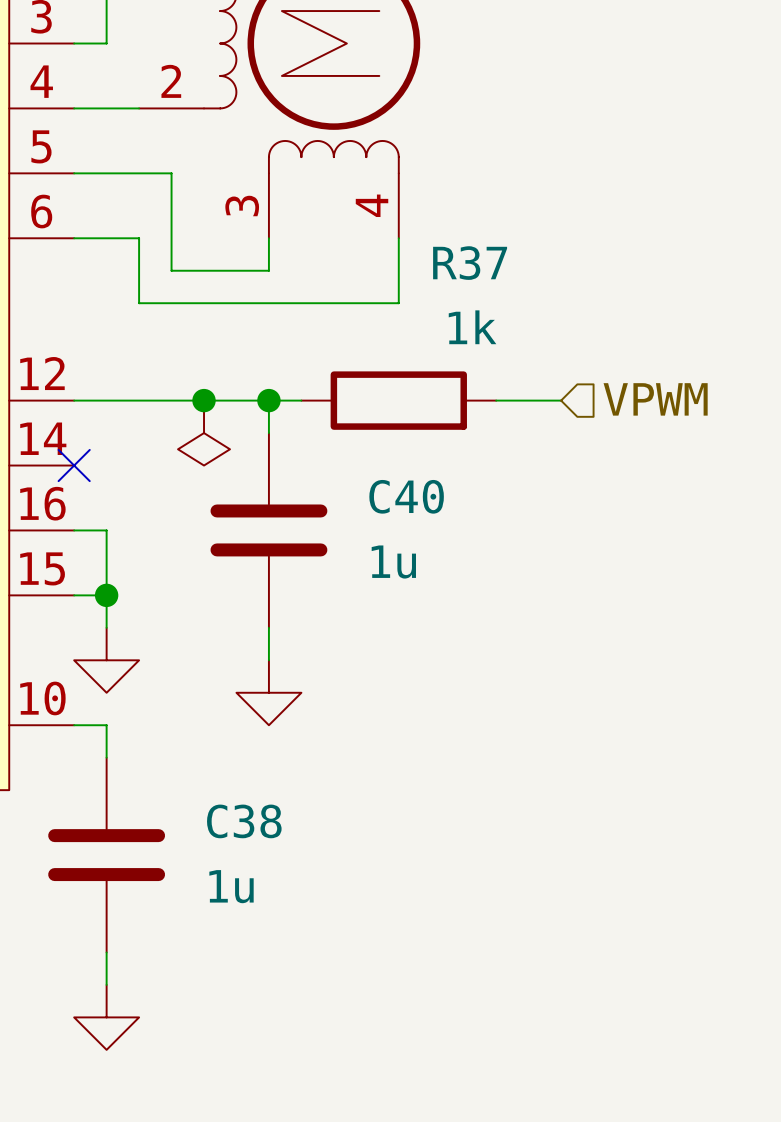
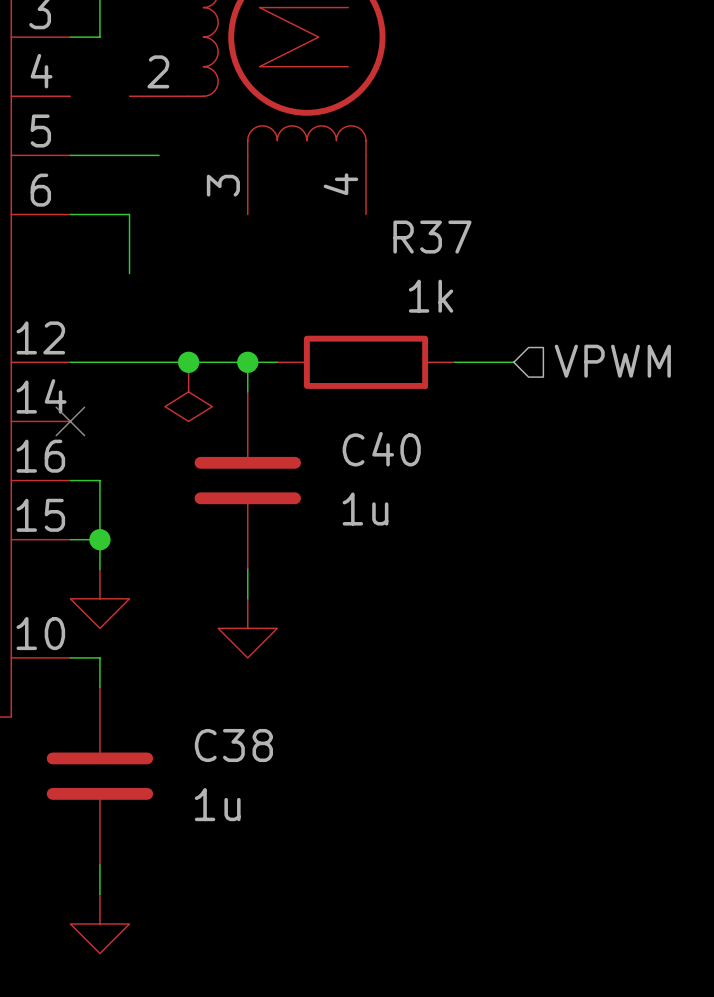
wire: (74, 108) (139, 108) -> none
wire: (171, 173) (171, 270) (268, 270) (268, 238) -> none
wire: (398, 238) (398, 303) (139, 303) -> none

